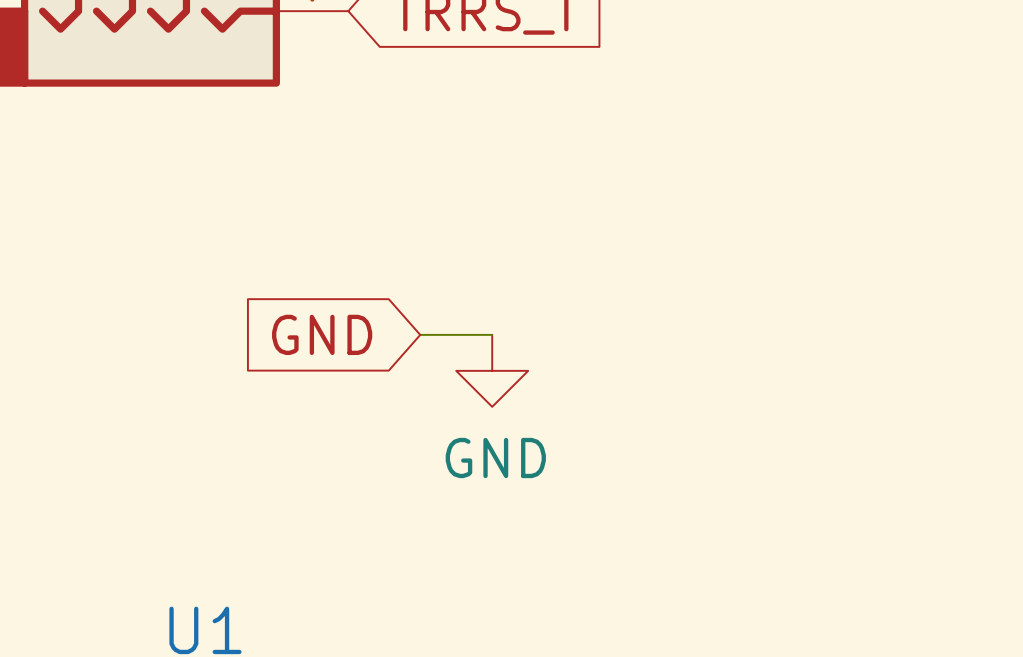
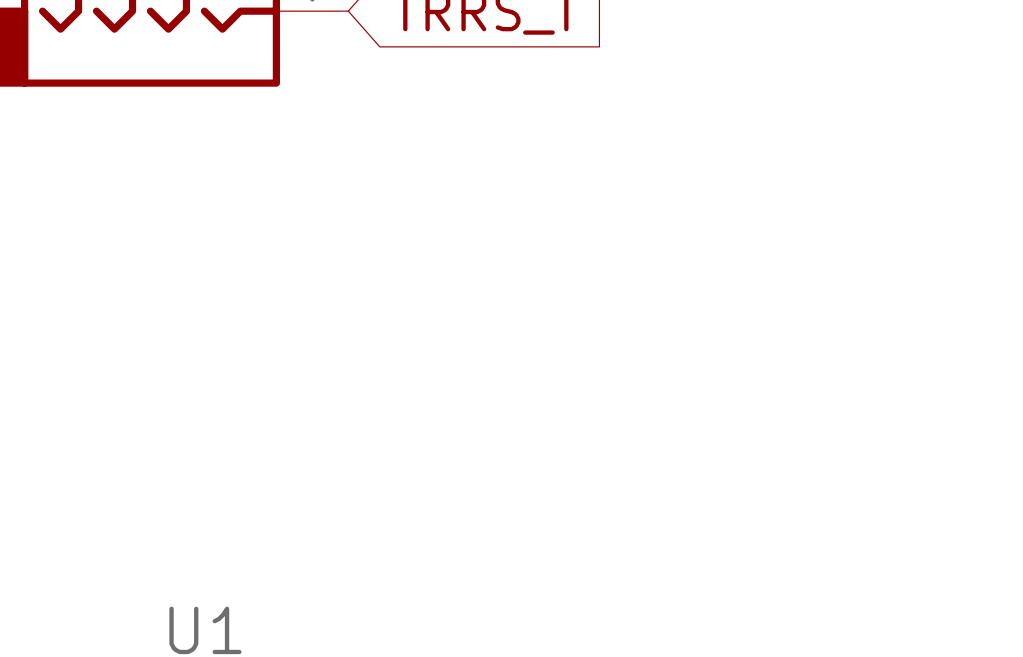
global label: GND (322, 334) -> none
wire: (420, 334) (492, 334) -> none
power symbol: GND (492, 370) -> none

